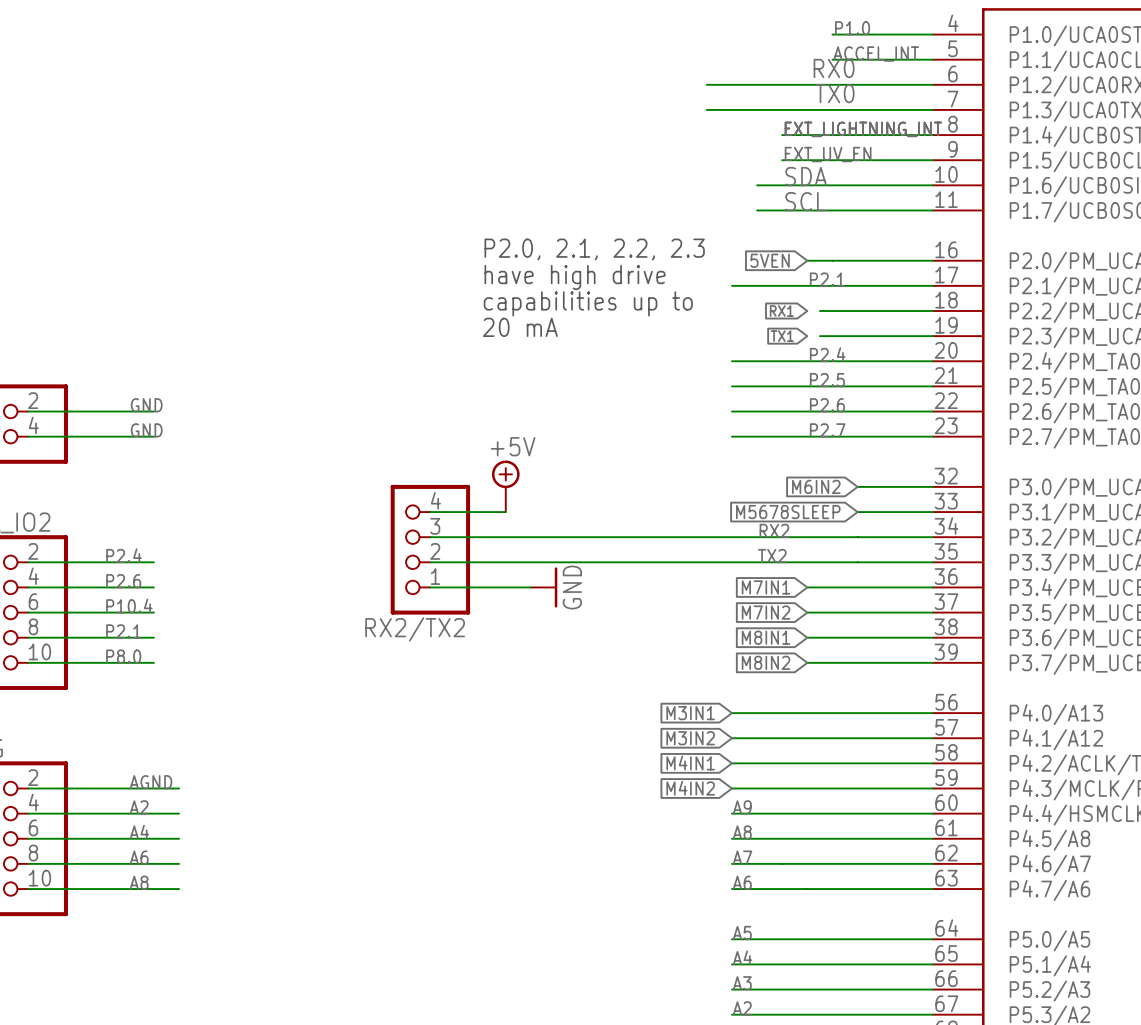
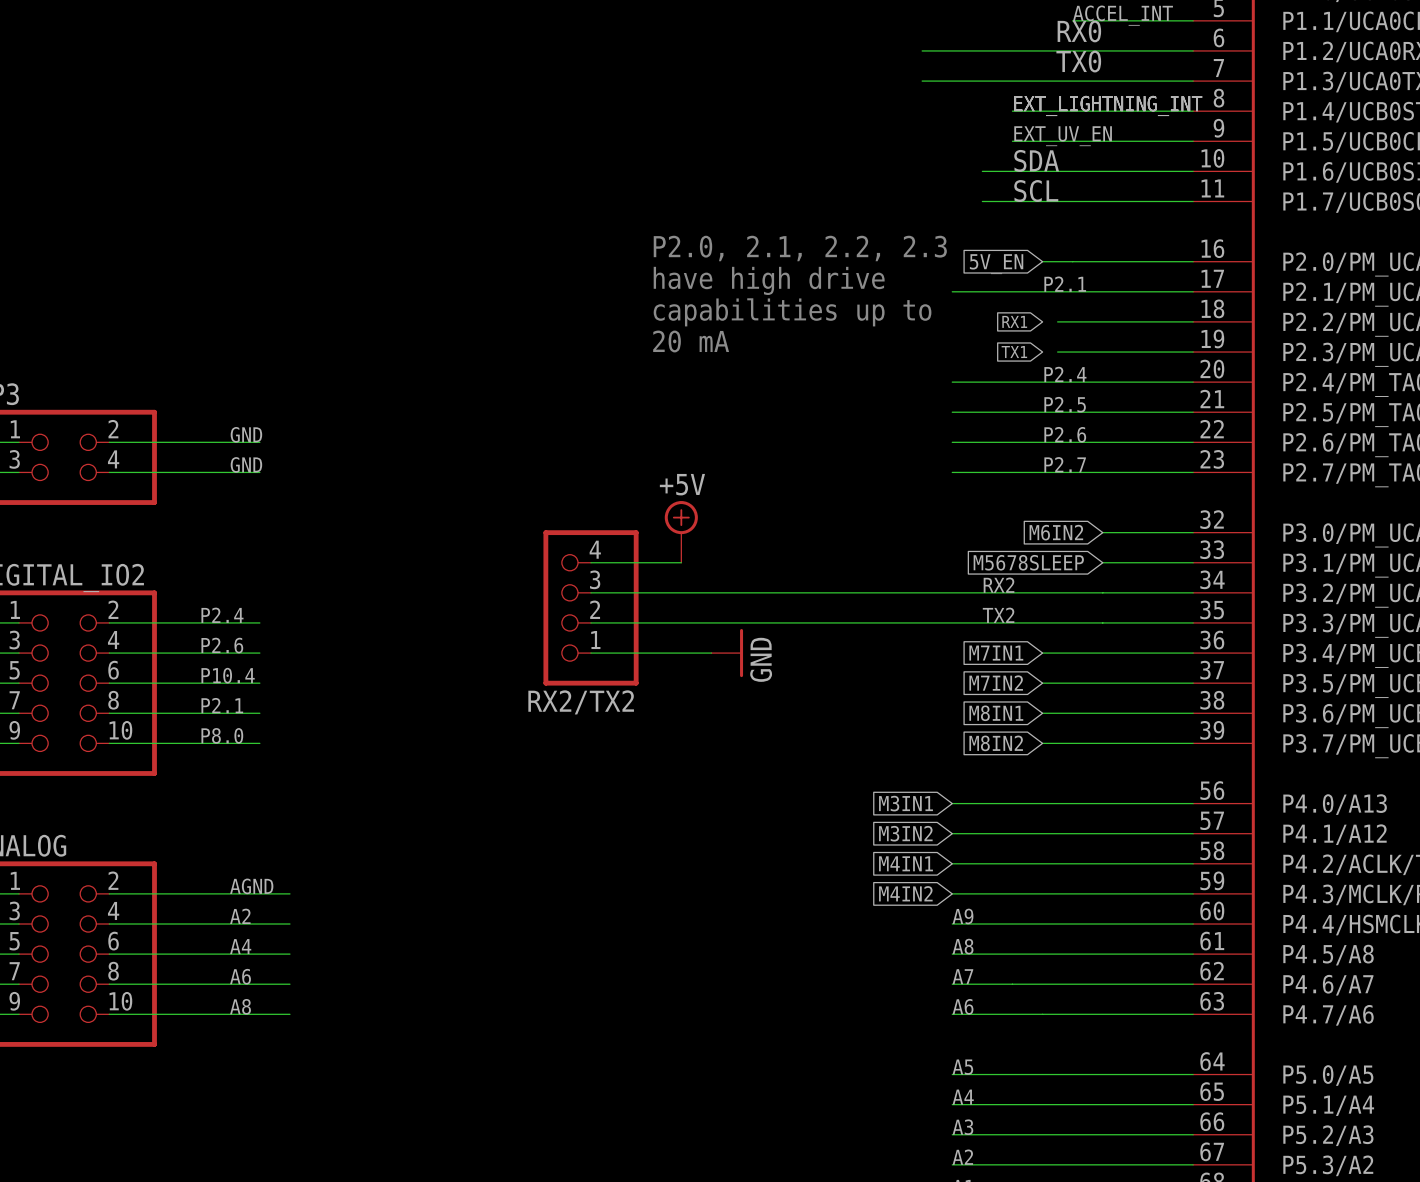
global label: 5VEN (770, 260) -> 5V_EN (996, 264)

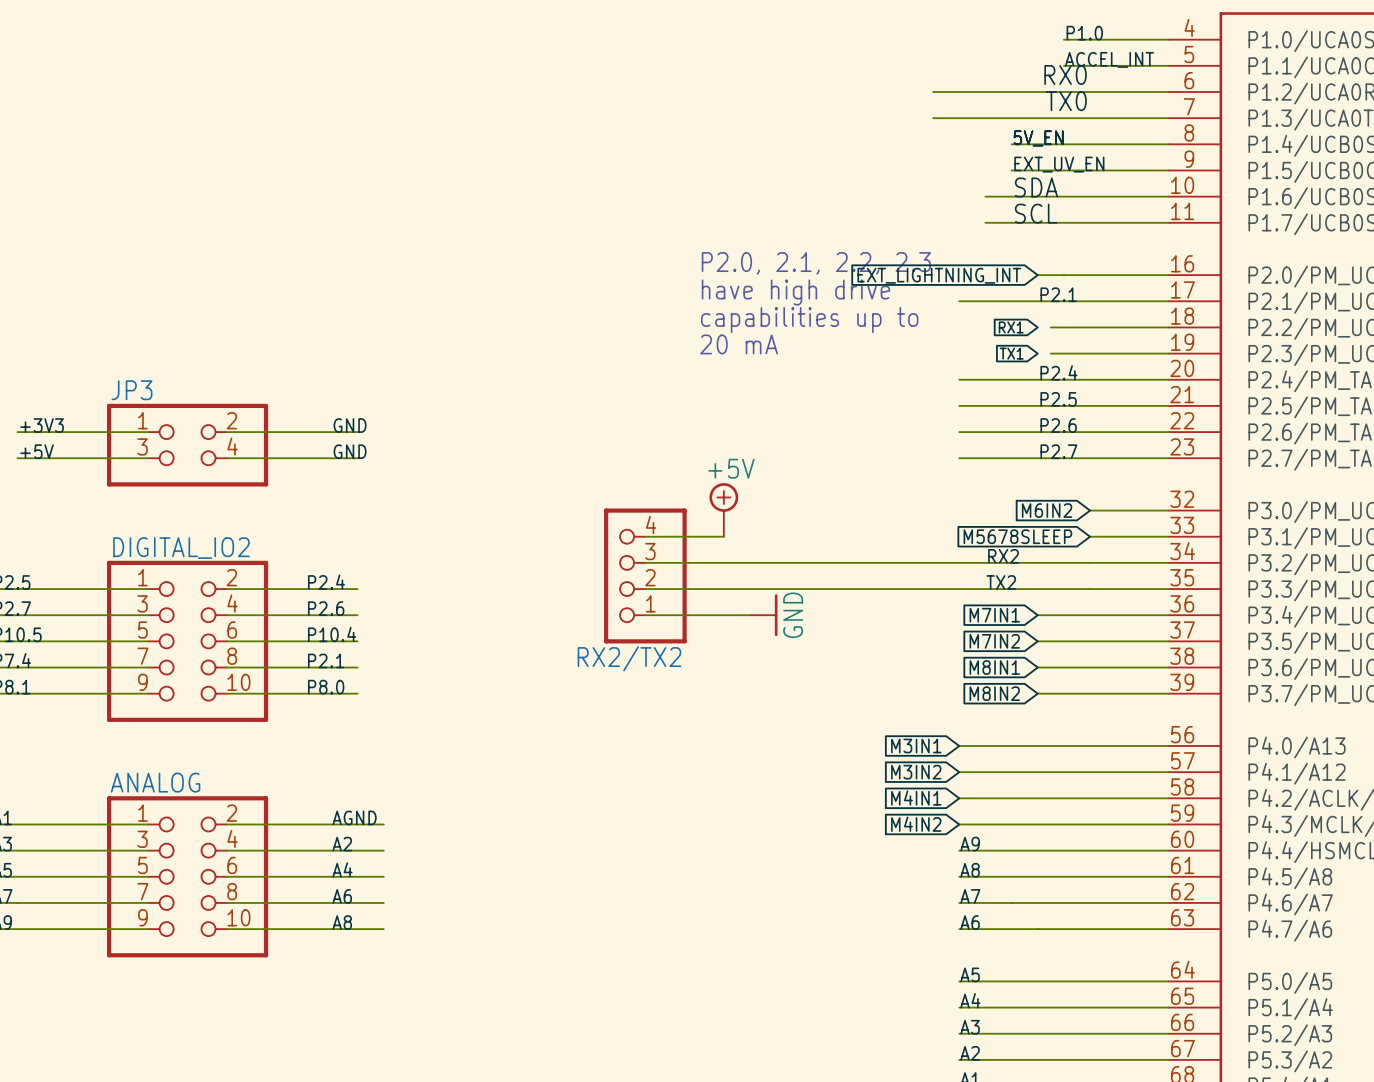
label: EXT_LIGHTNING_INT (1108, 105) -> 5V_EN (1038, 138)
global label: 5V_EN (996, 264) -> EXT_LIGHTNING_INT (939, 275)

